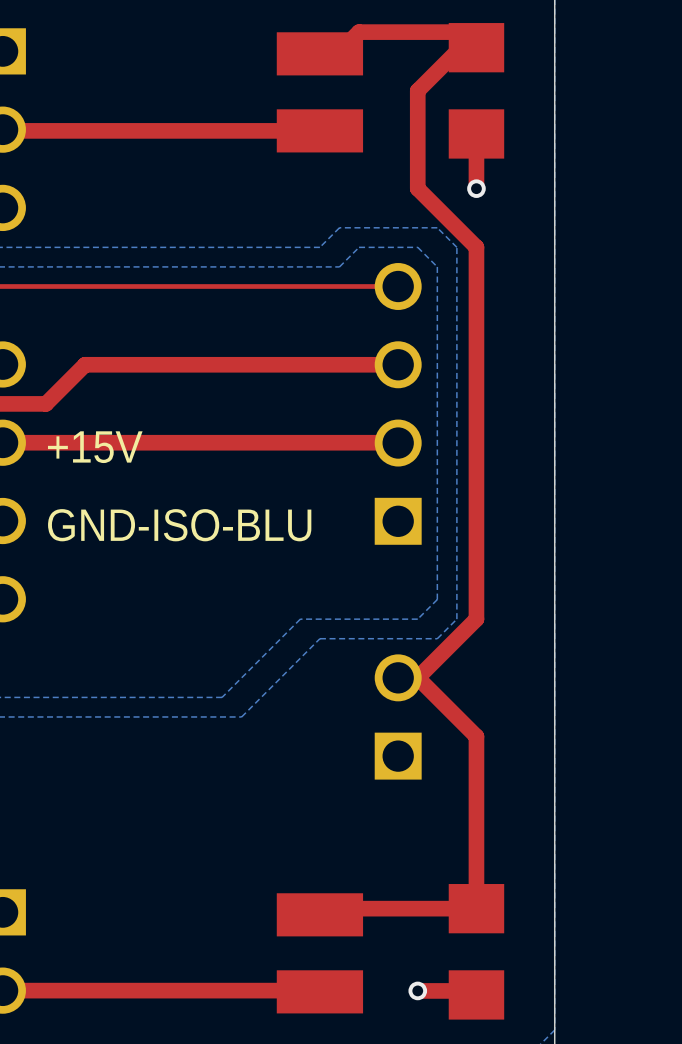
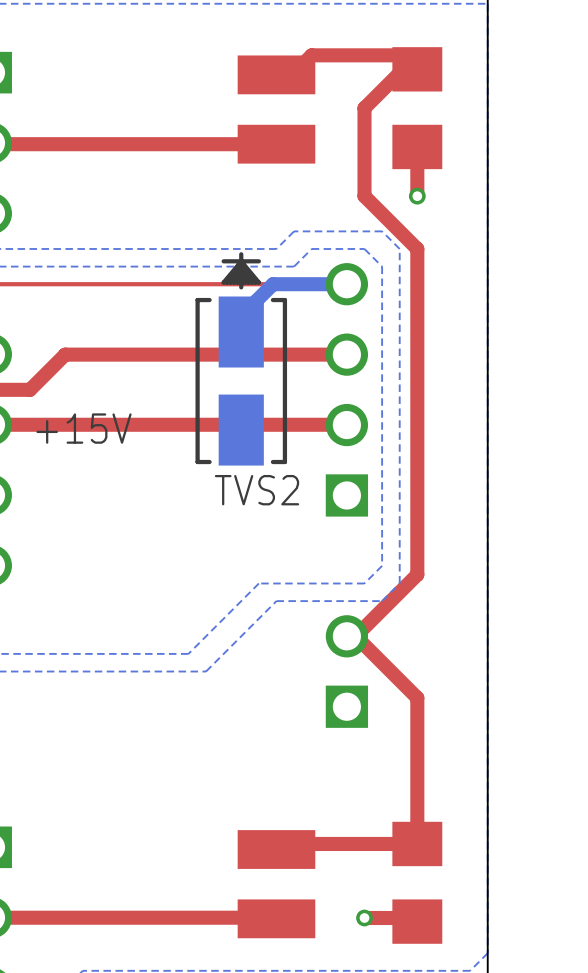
bottom track: none -> (346, 284) (273, 284) (256, 301) (256, 317) (241, 332)
TVS2: none -> (241, 358)
text: GND-ISO-BLU (179, 525) -> none
top track: (476, 609) (476, 619) (417, 677) -> (417, 574) (355, 636) (417, 697)
top track: (417, 677) (476, 736) (476, 746) -> none

